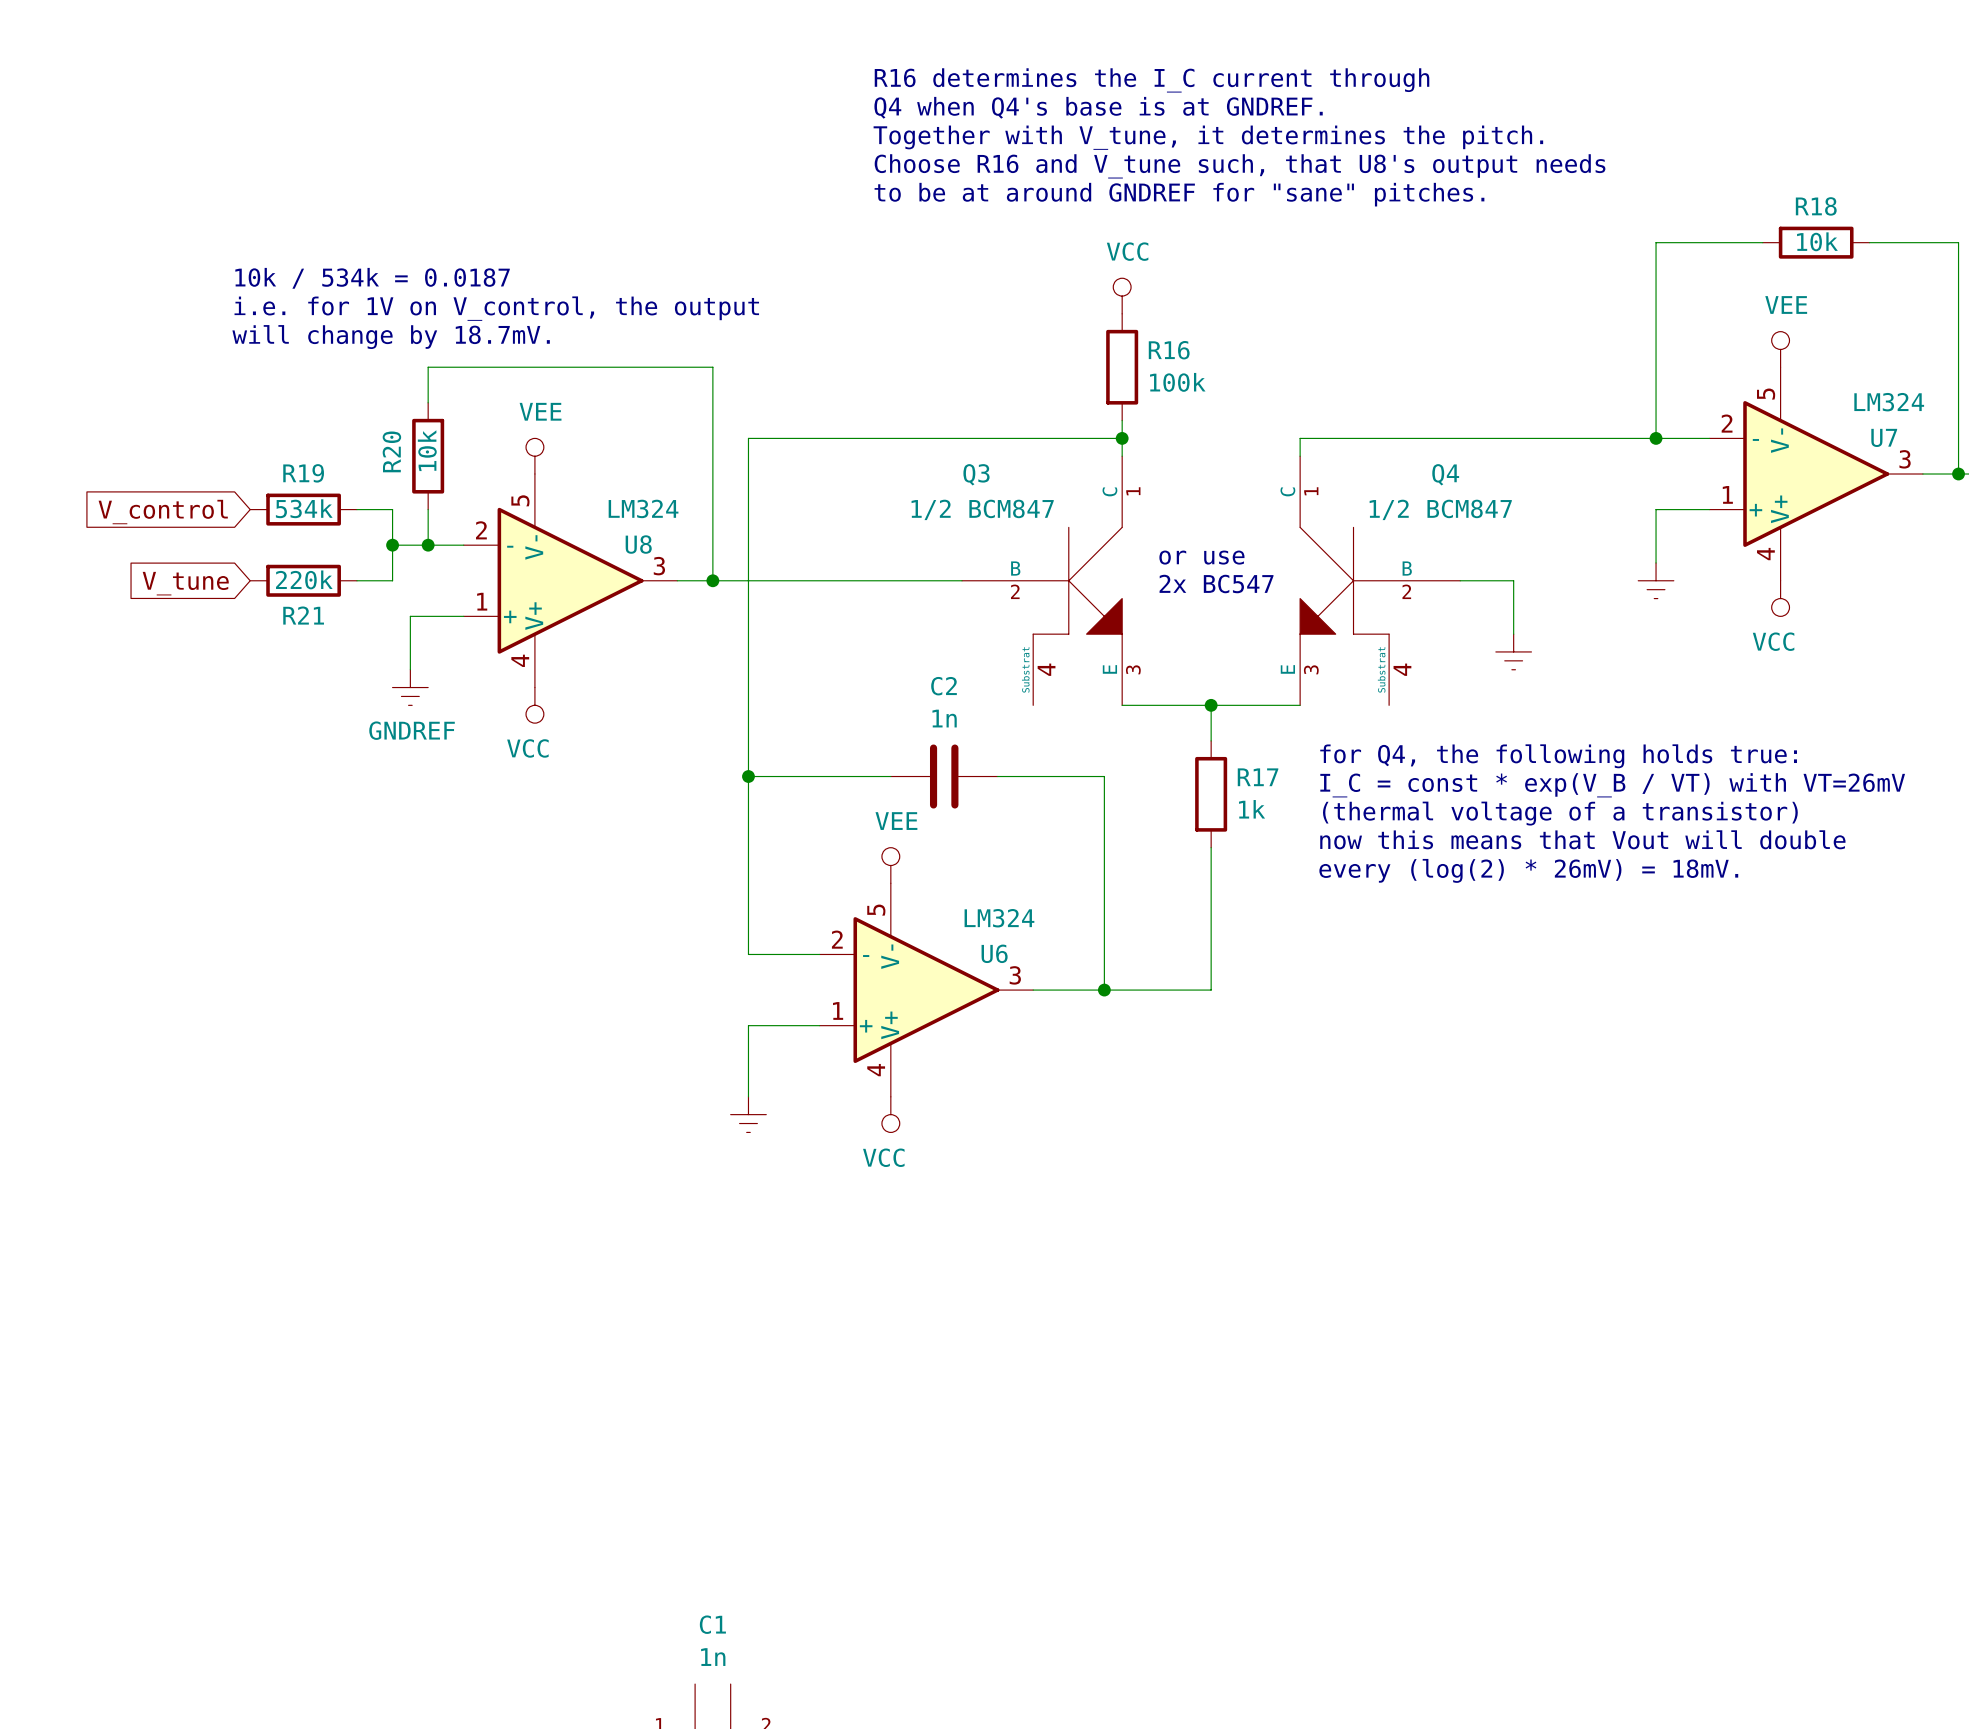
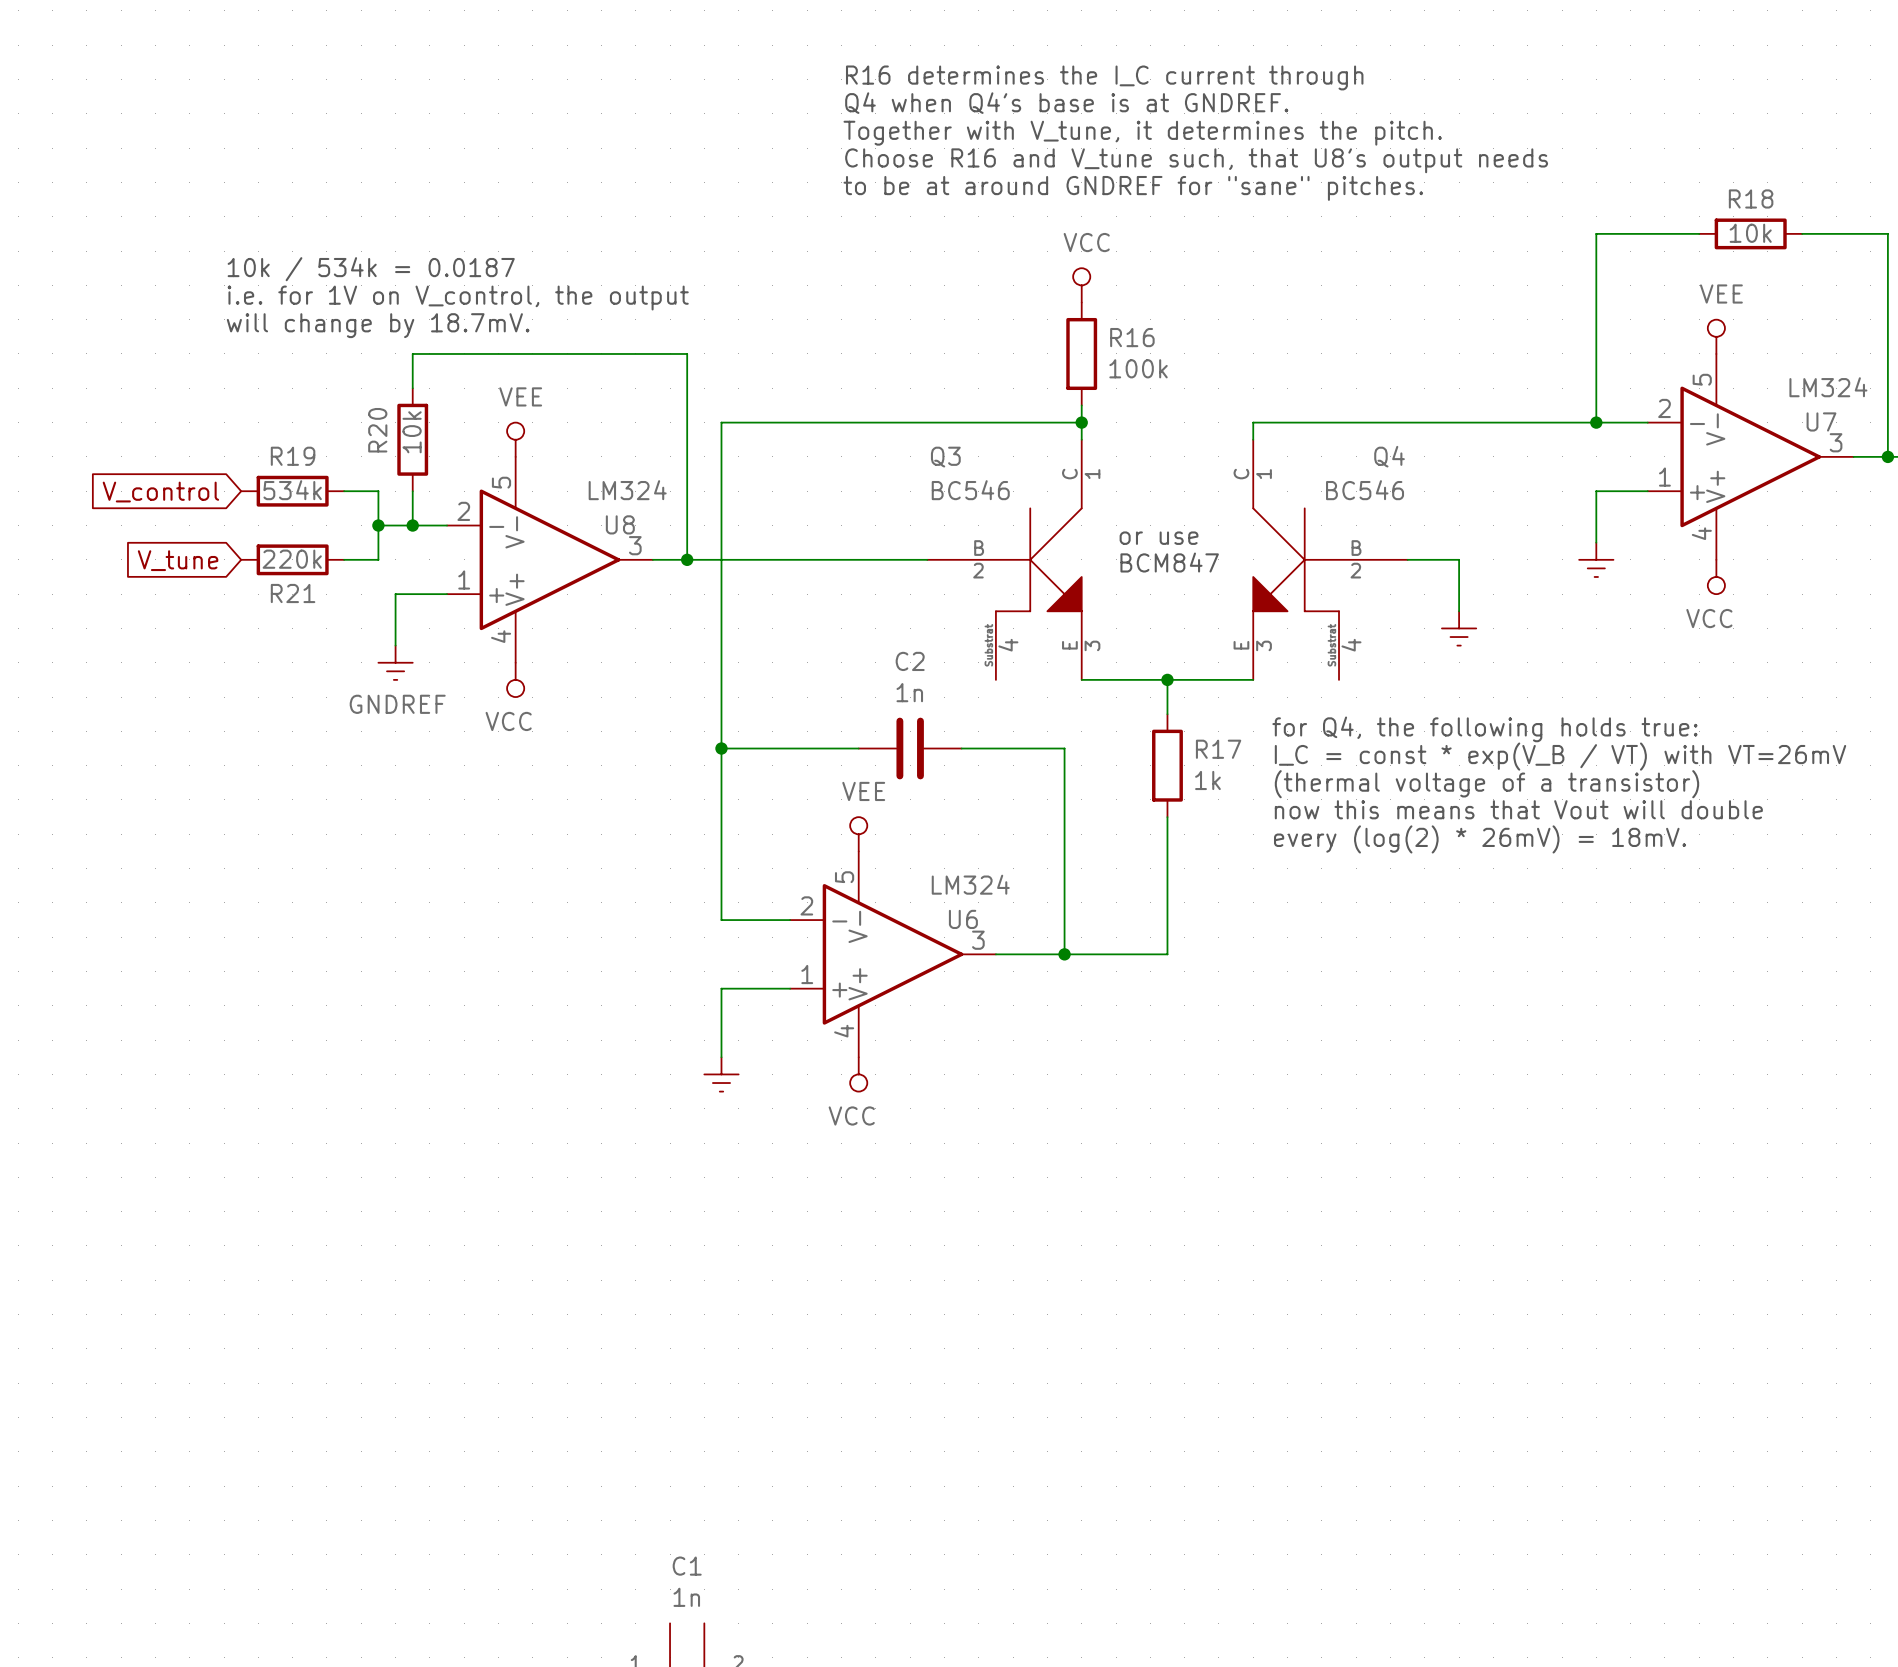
Q3 value: 1/2 BCM847 (982, 509) -> BC546 (970, 490)
Q4 value: 1/2 BCM847 (1440, 509) -> BC546 (1365, 490)
text: 2x BC547 (1216, 584) -> BCM847 (1169, 562)

